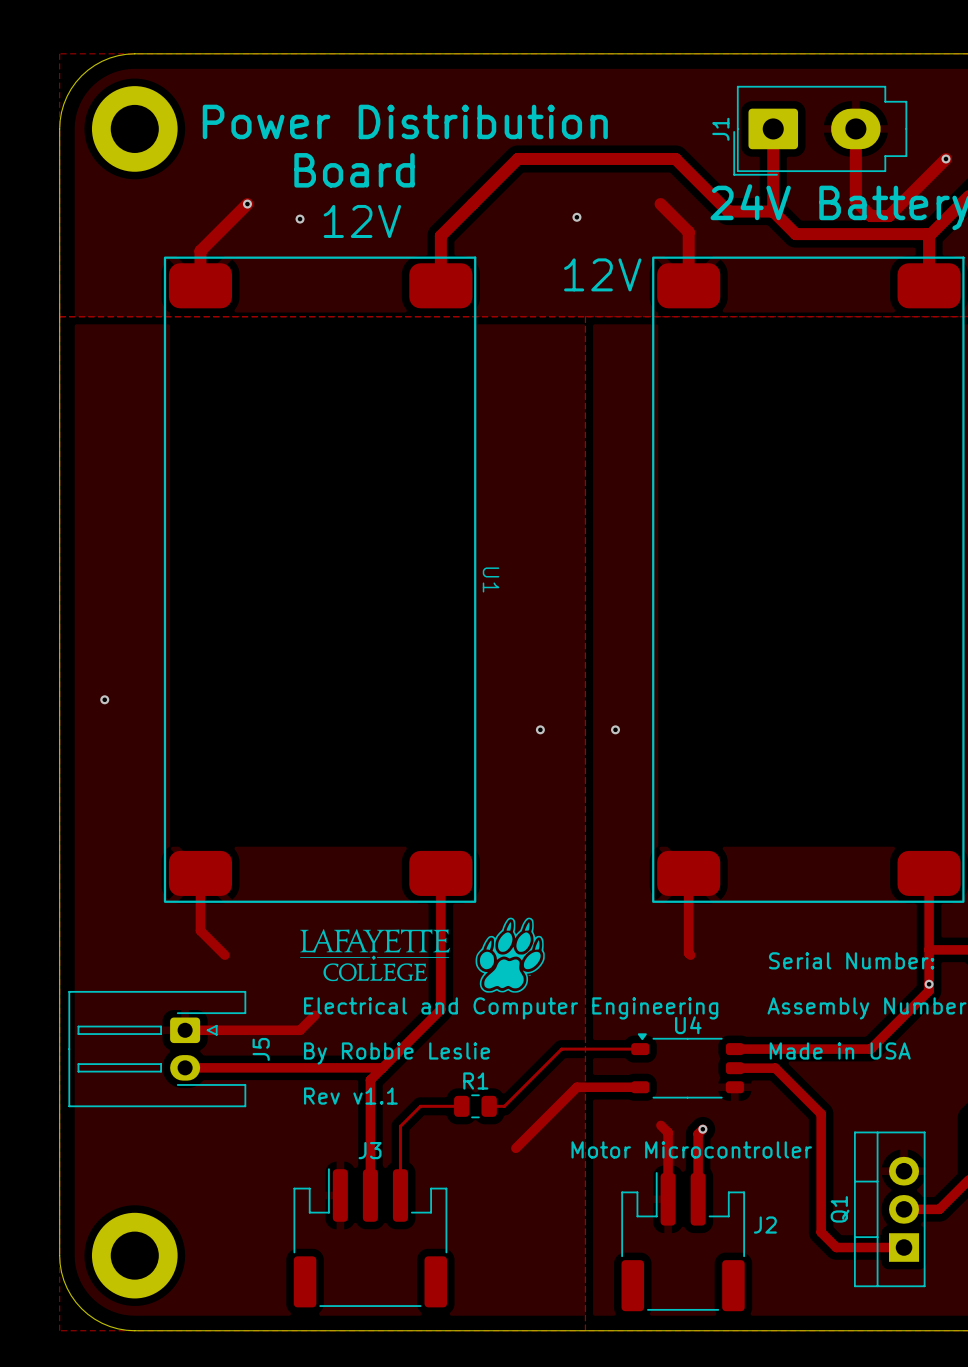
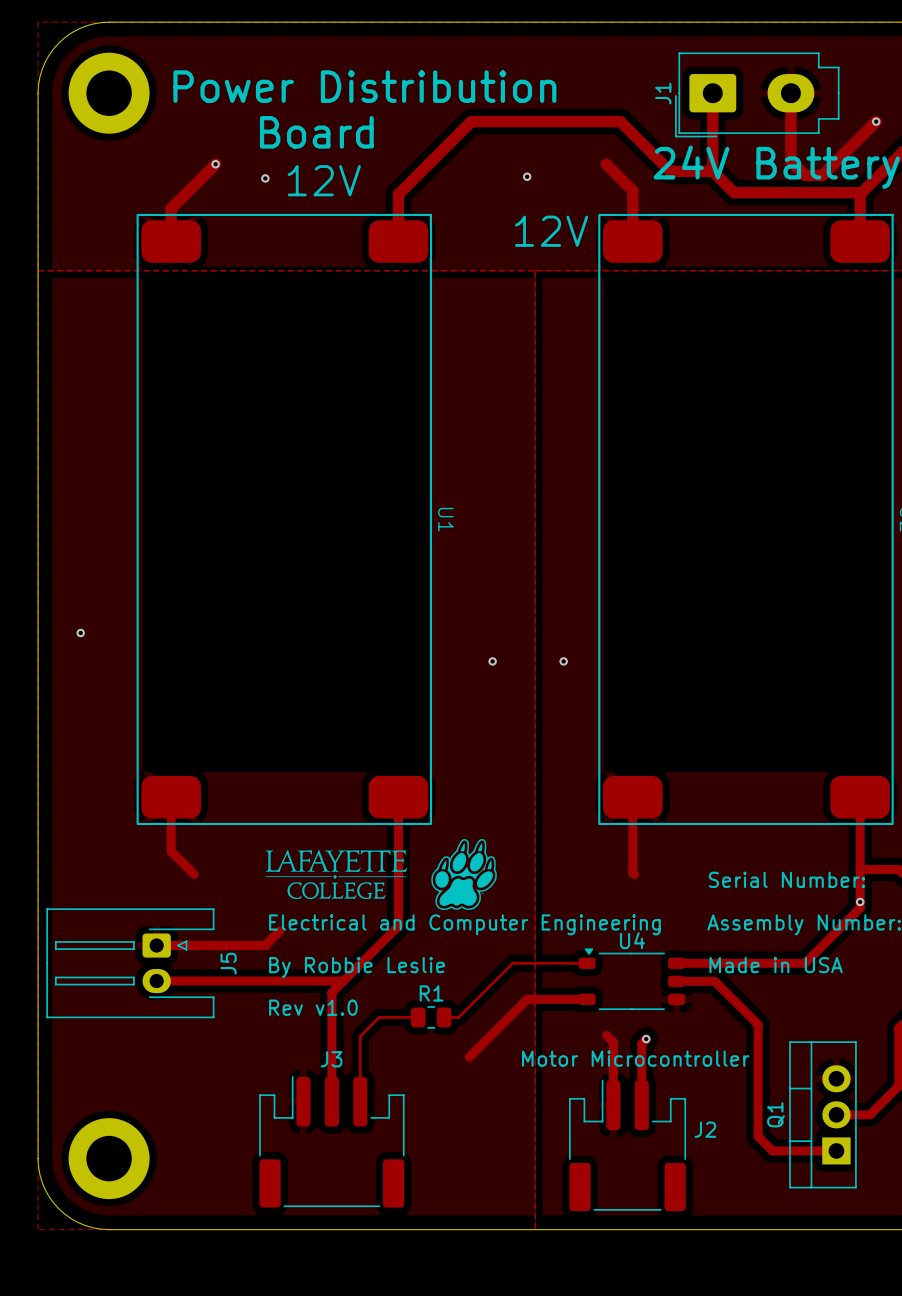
text: Rev v1.1 (350, 1096) -> Rev v1.0 (313, 1007)

